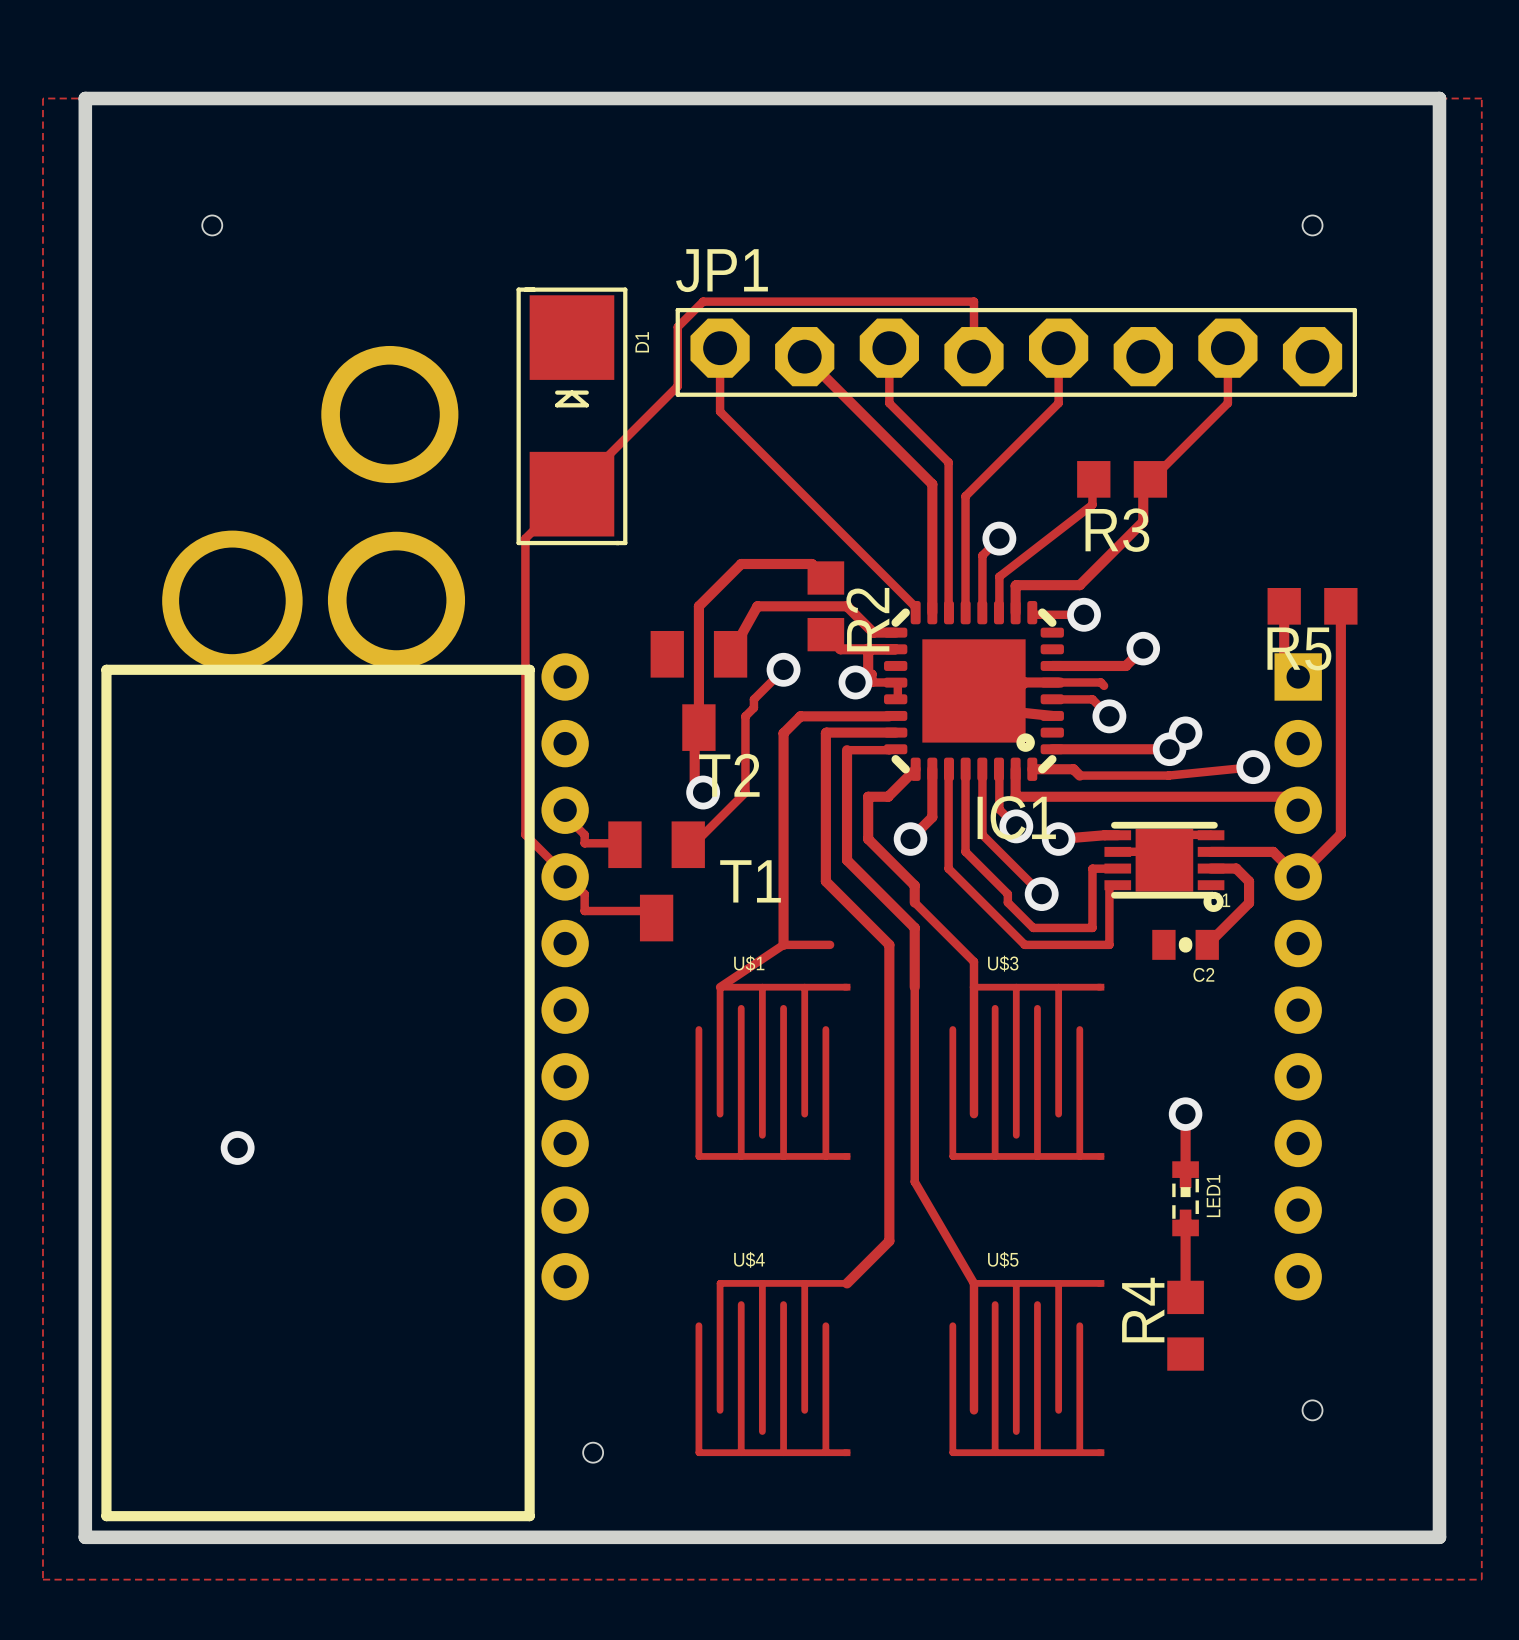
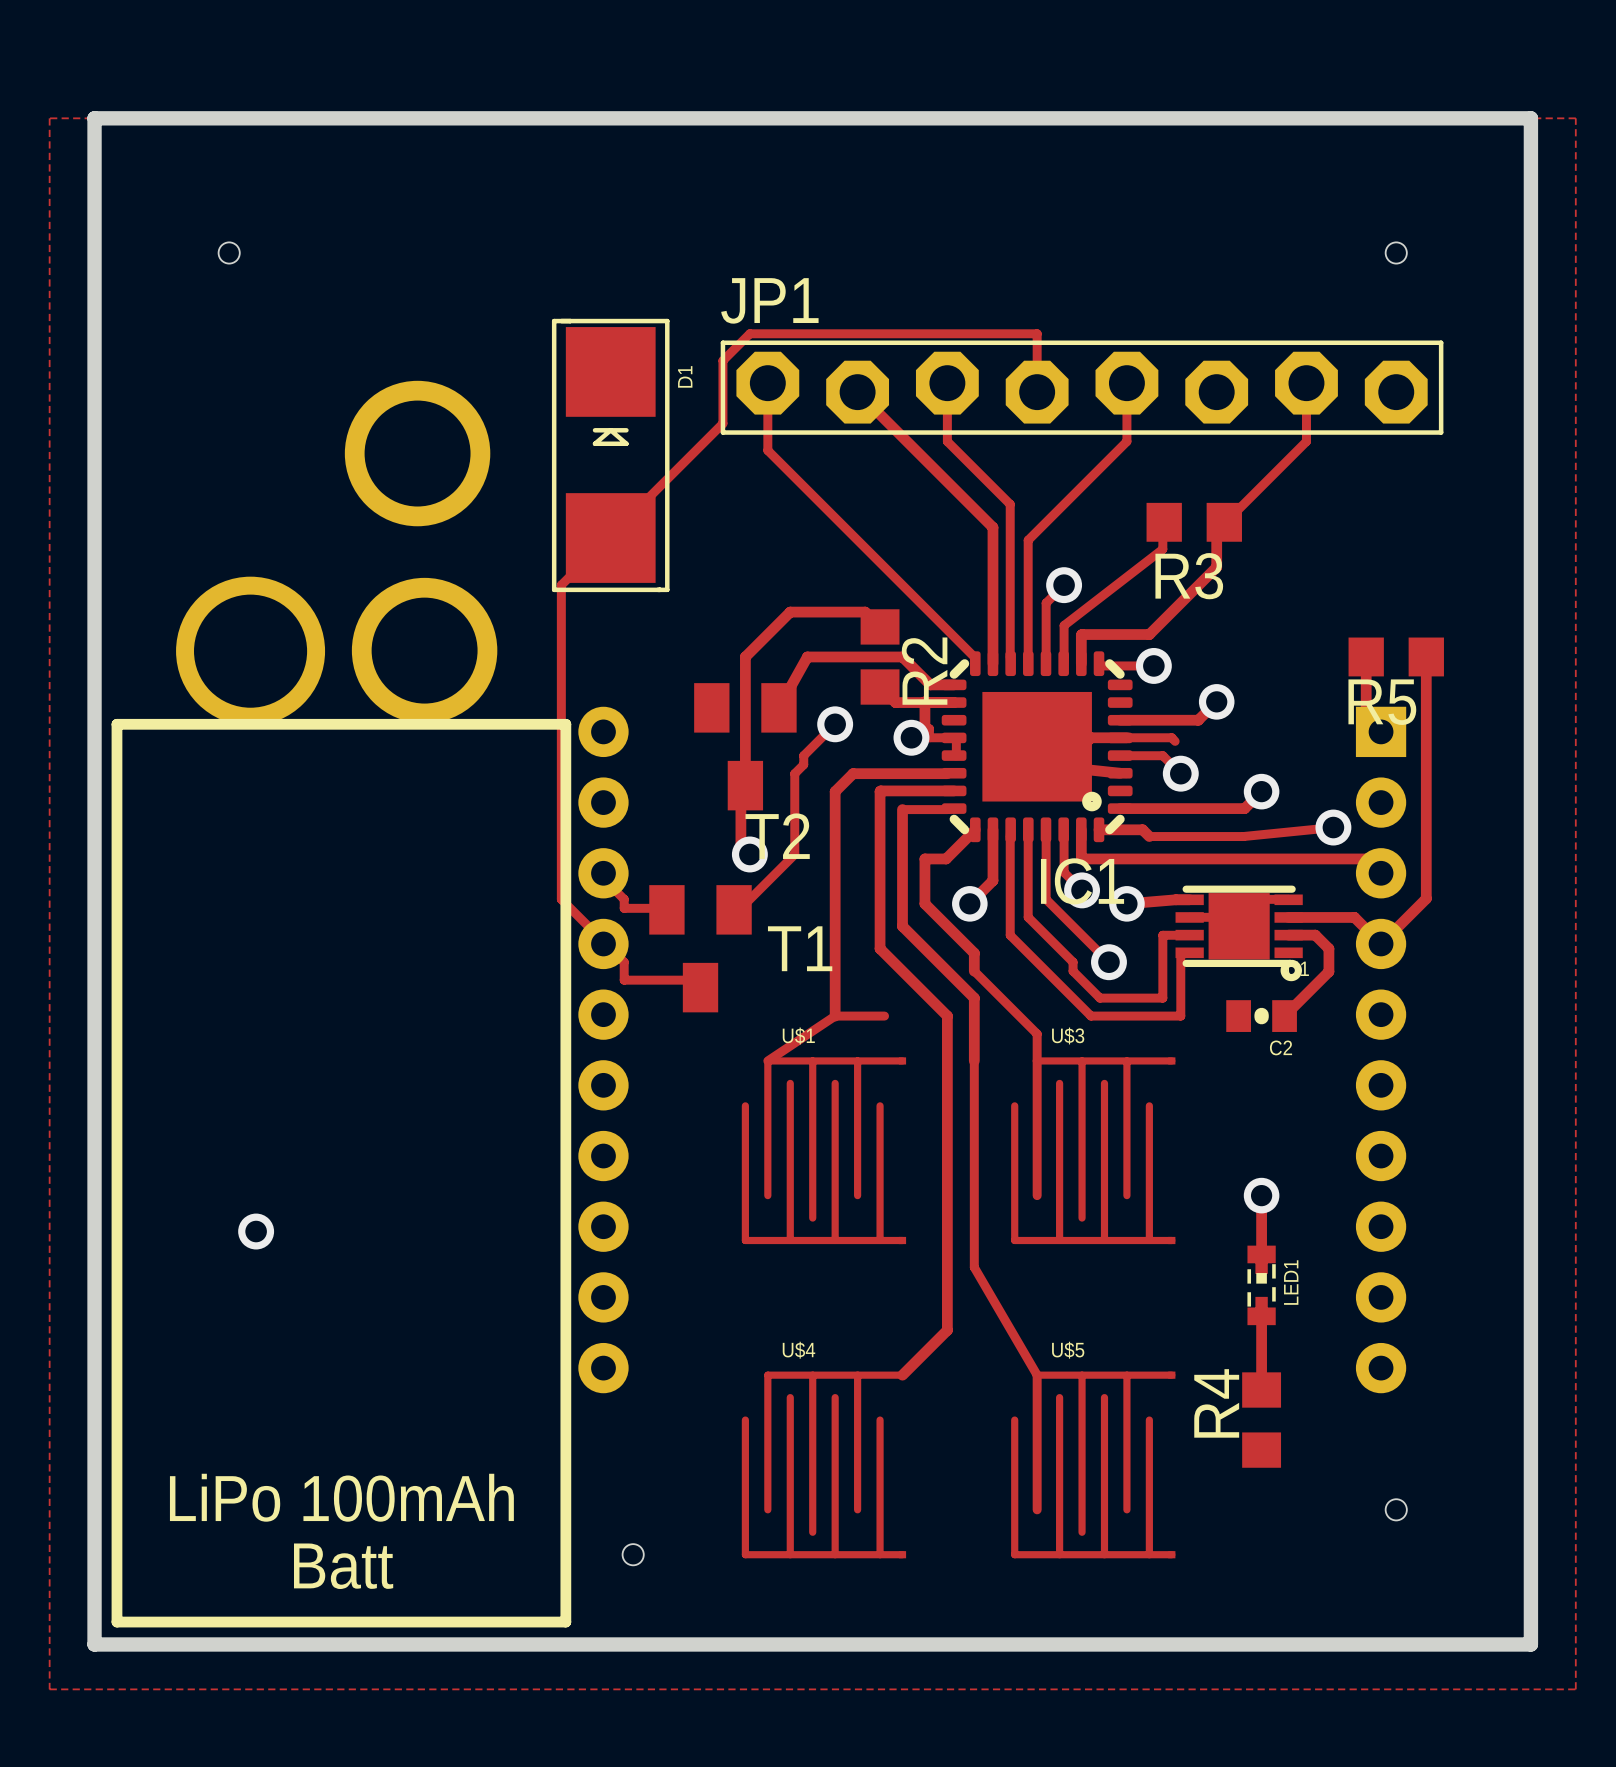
via: (1169, 749) -> none
text: none -> LiPo 100mAh (341, 1497)
text: none -> Batt (343, 1566)

